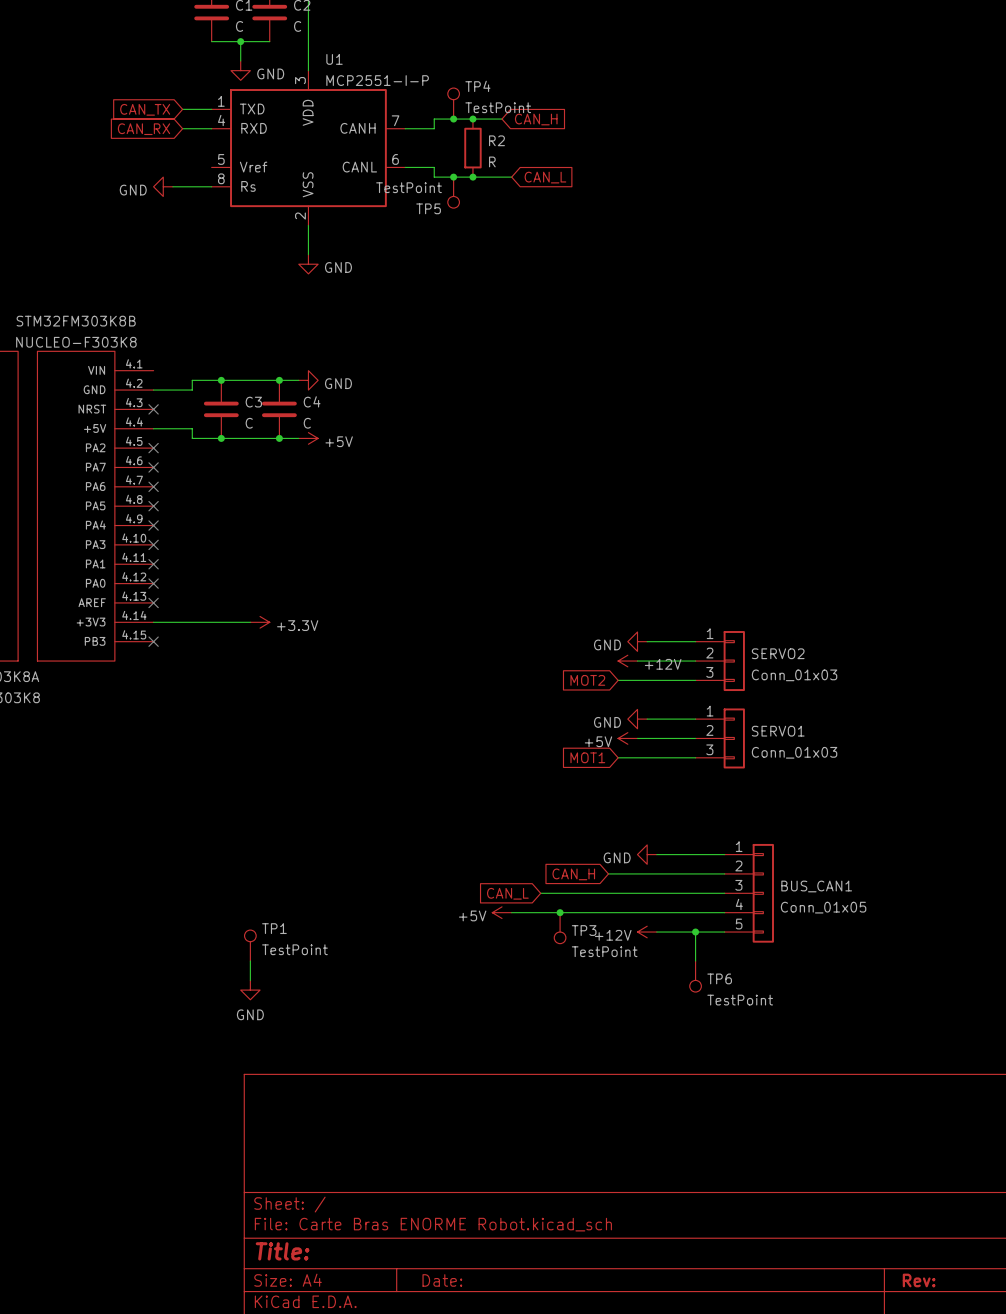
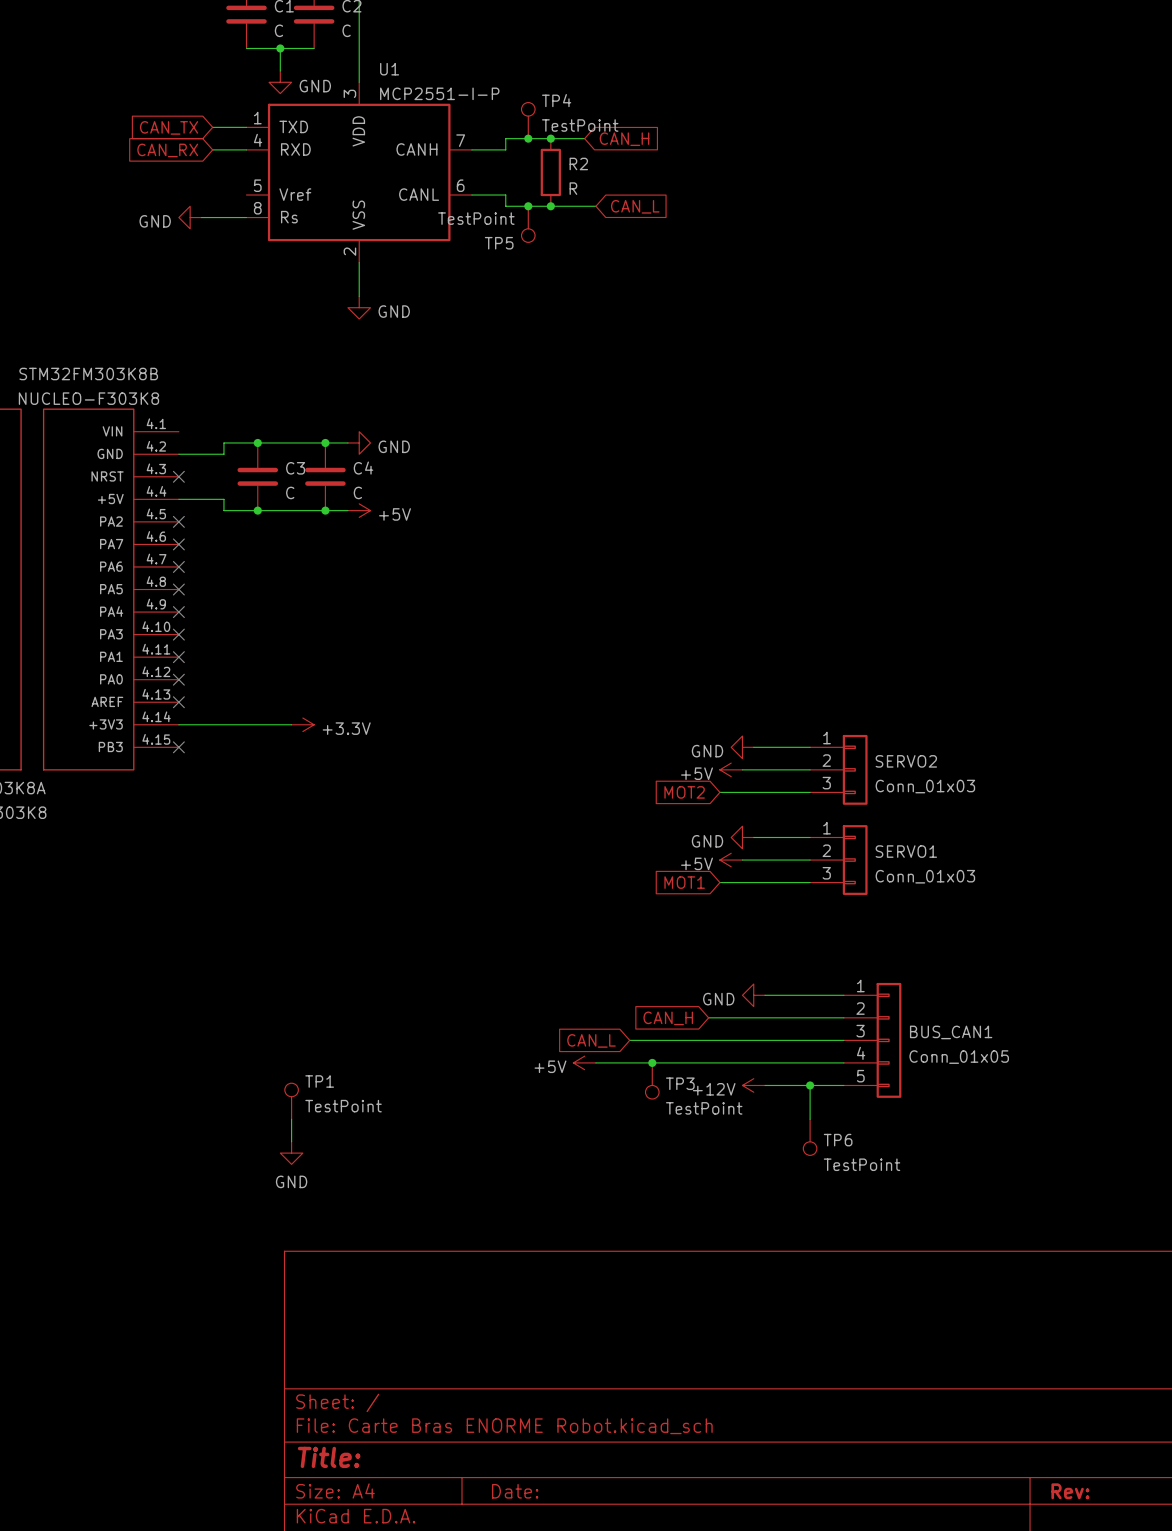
power symbol: +12V (627, 661) -> +5V (731, 769)

